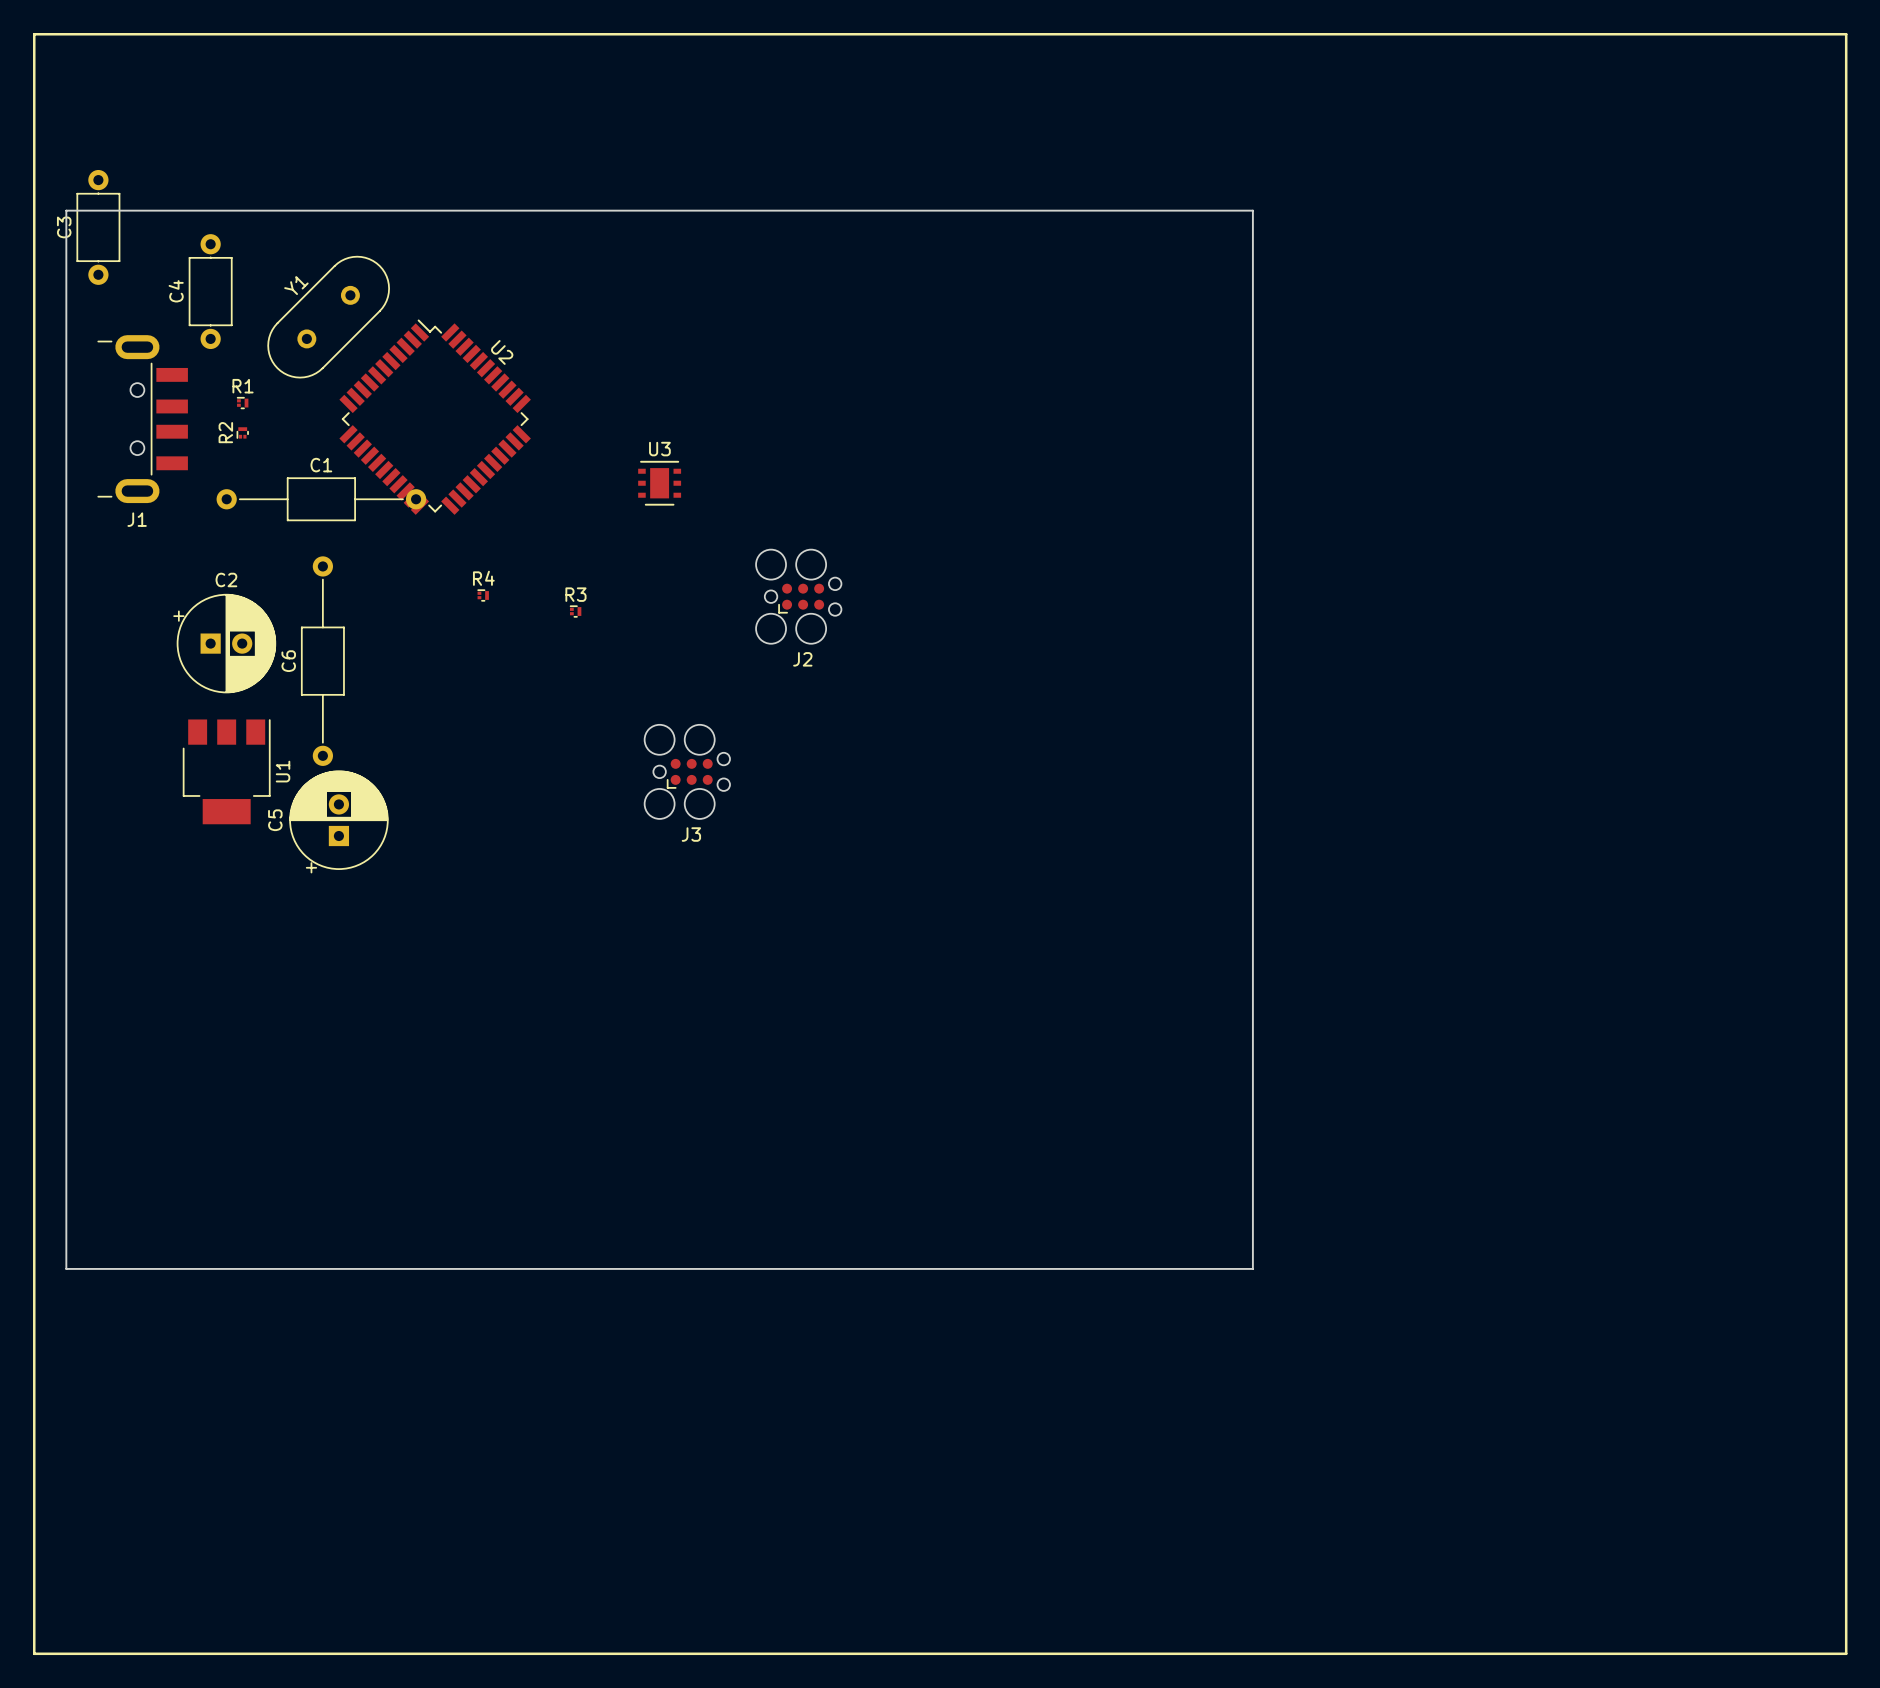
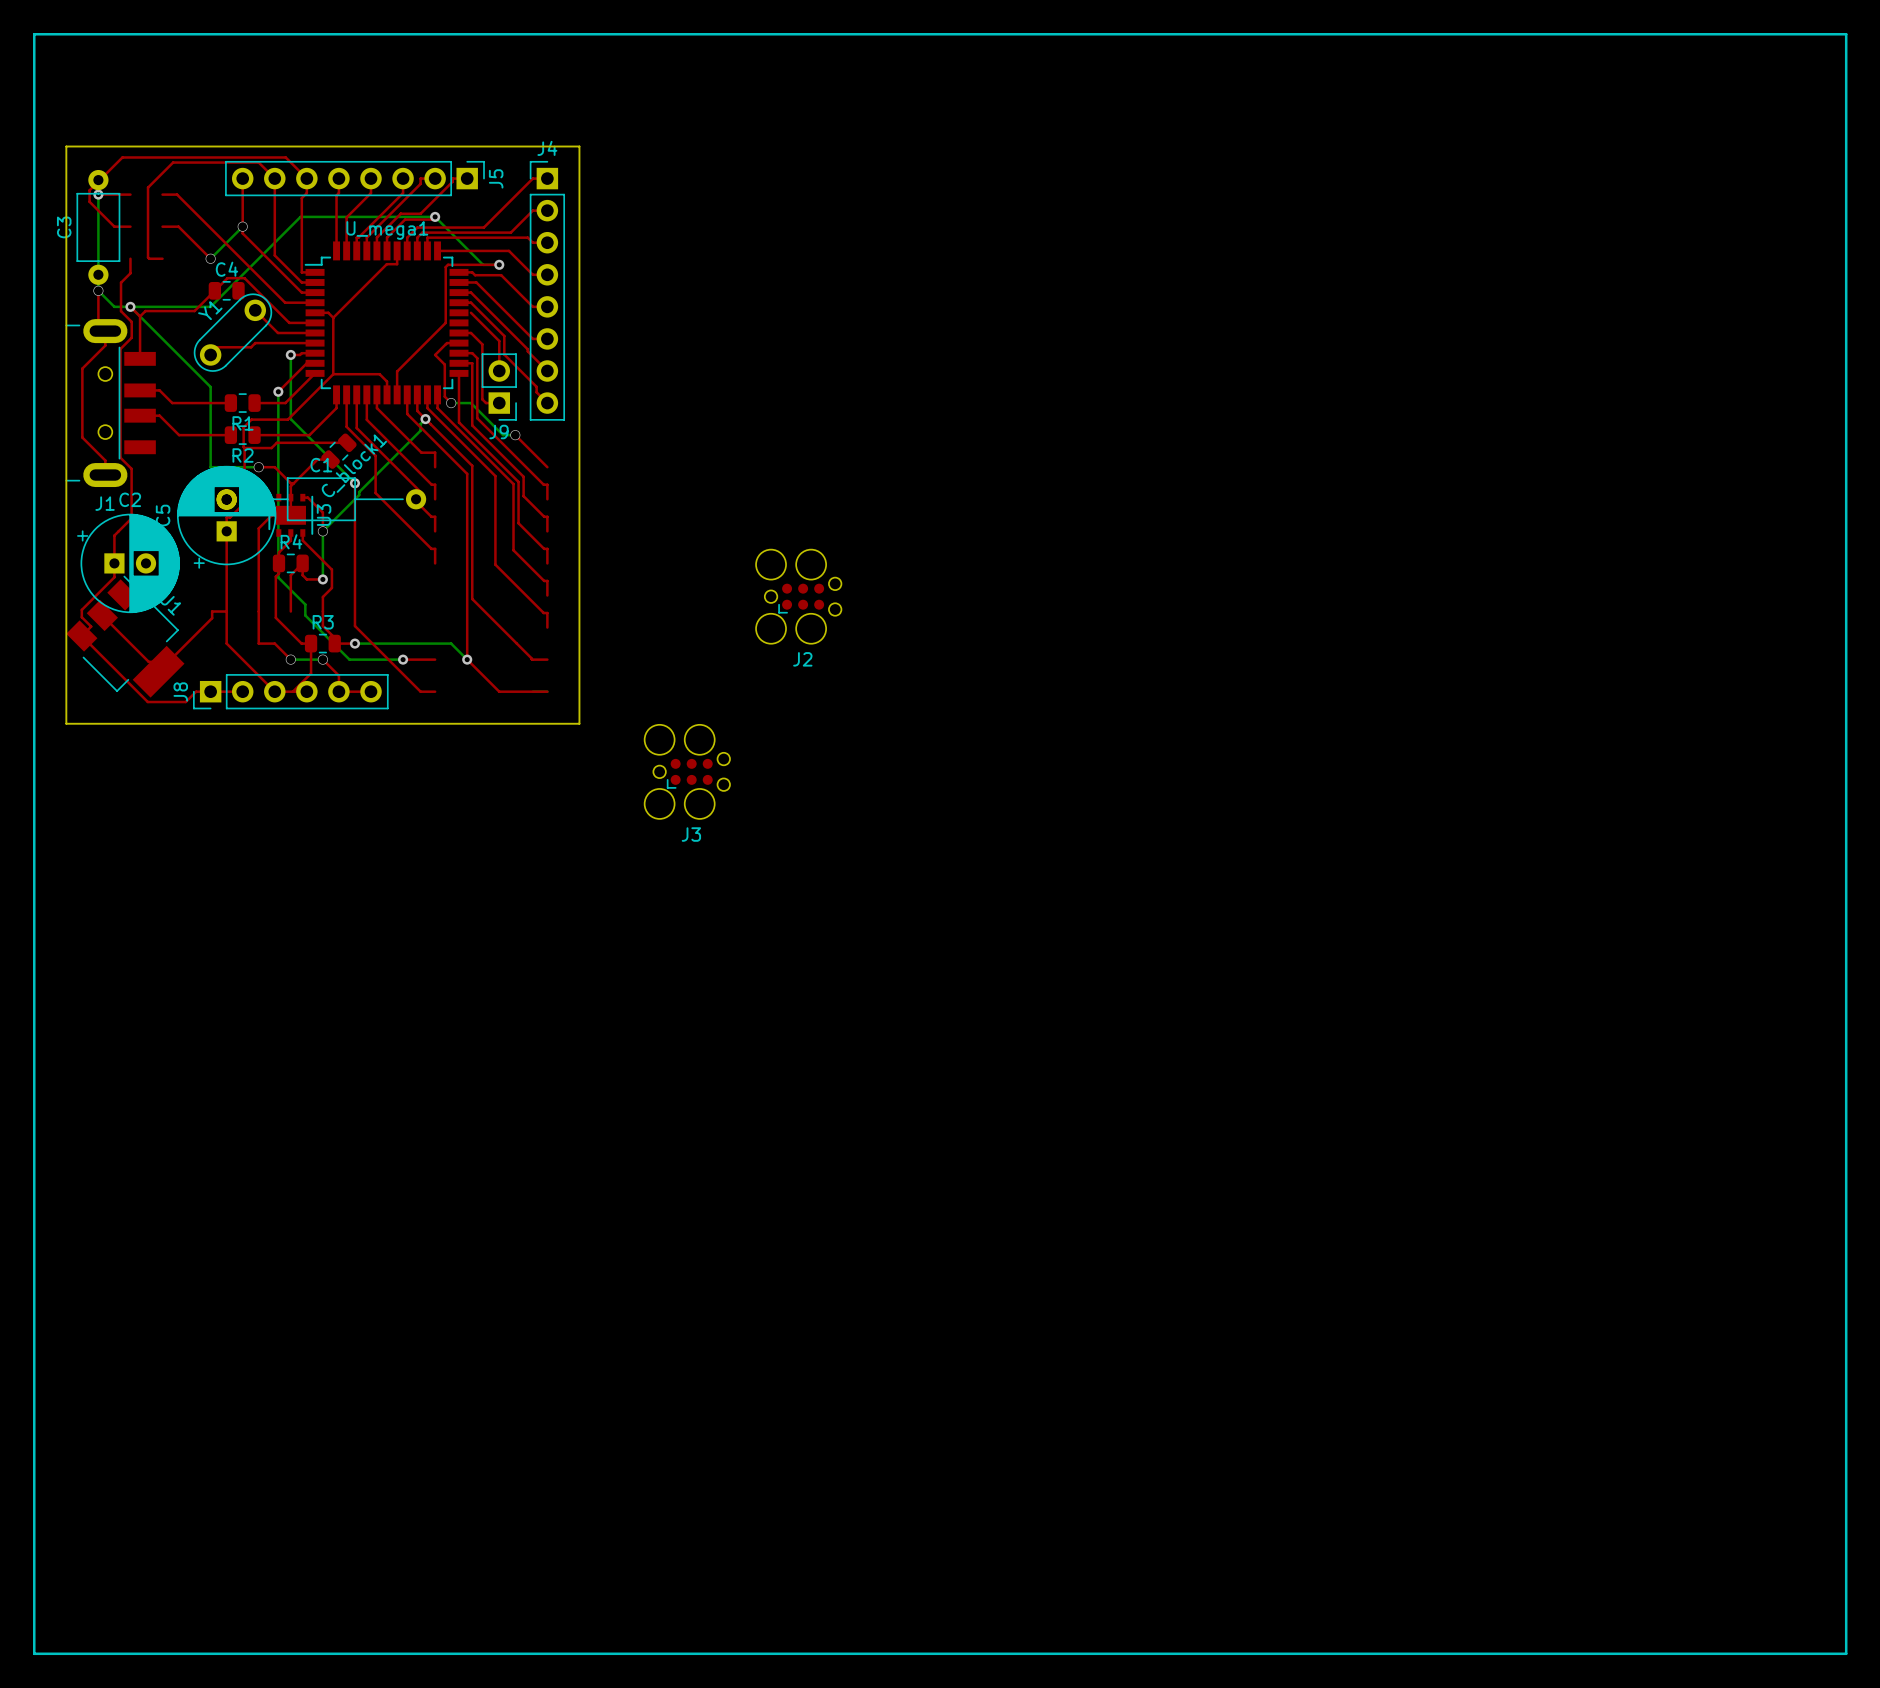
top track: none -> (242, 178) (242, 233) (301, 292) (315, 292)
top track: none -> (338, 178) (338, 193) (336, 195) (336, 250)
J5: none -> (354, 178)
top track: none -> (370, 178) (370, 193) (346, 217) (346, 250)
top track: none -> (403, 178) (403, 193) (356, 237) (356, 250)
top track: none -> (435, 178) (420, 178) (420, 183) (366, 237) (366, 250)
top track: none -> (467, 178) (452, 178) (452, 181) (420, 213) (400, 213) (376, 237) (376, 250)
top track: none -> (547, 178) (532, 178) (483, 227) (417, 227) (407, 237) (407, 250)
top track: none -> (98, 194) (130, 194)
bottom track: none -> (98, 194) (98, 290) (114, 306) (210, 306) (300, 216) (435, 216) (483, 264) (499, 264)
via: none -> (98, 194)
top track: none -> (162, 194) (177, 194) (285, 302) (315, 302)
board edge: (66, 210) (1252, 210) (1252, 1268) (66, 1268) (66, 723) -> (66, 210) (66, 146) (579, 146) (579, 723) (66, 723)
top track: none -> (547, 210) (532, 210) (510, 232) (422, 232) (417, 237) (417, 250)
top track: none -> (435, 216) (432, 219) (405, 219) (387, 237) (387, 250)
via: none -> (435, 216)
top track: none -> (130, 226) (114, 226) (89, 201) (89, 190) (122, 157) (285, 157) (306, 178) (306, 193) (301, 198) (301, 272) (315, 272)
top track: none -> (162, 226) (178, 226) (210, 258)
bottom track: none -> (242, 226) (210, 258)
via: none -> (242, 226)
C4 footprint: [188, 234, 233, 350] -> [208, 281, 245, 301]
top track: none -> (547, 242) (532, 242) (527, 237) (427, 237) (427, 250)
top track: none -> (397, 250) (397, 264) (386, 264) (333, 317)
top track: none -> (437, 250) (508, 250) (532, 274) (547, 274)
Y1 footprint: [267, 255, 390, 379] -> [193, 293, 273, 372]
top track: none -> (130, 258) (130, 273) (121, 282) (121, 311) (131, 321) (131, 337) (120, 349) (120, 457) (131, 468) (131, 518) (114, 535) (114, 577) (81, 609) (81, 617) (91, 626) (81, 636) (147, 702) (185, 702) (196, 691) (242, 691)
top track: none -> (162, 258) (148, 257) (148, 187) (173, 162) (258, 162) (274, 178) (274, 255) (301, 282) (315, 282)
via: none -> (210, 258)
top track: none -> (499, 264) (448, 264) (445, 267) (445, 322) (397, 371) (397, 394)
via: none -> (499, 264)
top track: none -> (459, 272) (472, 272) (475, 275) (501, 275) (532, 306) (547, 306)
top track: none -> (459, 282) (476, 282) (532, 338) (547, 338)
top track: none -> (98, 290) (98, 324) (105, 331) (105, 345) (82, 368) (82, 437) (105, 460) (105, 475)
via: none -> (98, 290)
J4: none -> (547, 290)
C4 name position: C4 (176, 291) -> C4 (226, 269)
top track: none -> (459, 292) (470, 292) (547, 370)
top track: none -> (459, 302) (470, 302) (504, 336) (504, 354) (536, 386) (536, 392) (547, 403)
top track: none -> (130, 306) (140, 316)
bottom track: none -> (130, 306) (210, 387) (210, 467) (258, 467)
via: none -> (130, 306)
top track: none -> (254, 310) (277, 332) (315, 332)
top track: none -> (315, 312) (328, 312) (333, 317)
top track: none -> (470, 312) (499, 341) (499, 370)
top track: none -> (140, 316) (145, 311) (194, 311) (227, 278) (244, 278) (289, 322) (315, 322)
top track: none -> (140, 316) (140, 358)
top track: none -> (333, 317) (333, 374)
U_mega1: none -> (386, 322)
top track: none -> (459, 332) (470, 332) (482, 344) (482, 399) (486, 403) (499, 403)
top track: none -> (315, 343) (255, 343) (251, 347) (214, 347) (211, 351) (210, 354)
top track: none -> (459, 343) (447, 343) (435, 354) (444, 364) (444, 396) (451, 403)
top track: none -> (315, 353) (290, 354)
top track: none -> (459, 353) (472, 353) (477, 358) (477, 418) (543, 484) (547, 484) (547, 499)
bottom track: none -> (290, 354) (290, 419) (354, 483)
via: none -> (290, 354)
top track: none -> (315, 363) (306, 363) (278, 391)
top track: none -> (459, 363) (472, 363) (472, 425) (523, 476) (523, 496) (544, 516) (547, 516) (547, 531)
top track: none -> (315, 373) (285, 403) (254, 403)
top track: none -> (459, 373) (459, 422) (518, 481) (518, 523) (544, 548) (547, 548) (547, 563)
top track: none -> (333, 374) (287, 419) (251, 419) (243, 427) (244, 448)
top track: none -> (333, 374) (379, 374) (387, 381) (387, 394)
R1 name position: R1 (243, 386) -> R1 (243, 423)
J9: none -> (499, 387)
top track: none -> (140, 390) (159, 390) (172, 403) (230, 403)
via: none -> (278, 391)
bottom track: none -> (276, 393) (278, 391) (278, 577) (305, 604) (305, 615) (349, 659) (403, 659)
top track: none -> (336, 394) (336, 408) (309, 435) (254, 435)
top track: none -> (346, 394) (346, 426) (375, 455) (375, 493) (431, 548) (435, 548) (435, 563)
top track: none -> (356, 394) (356, 428) (420, 491) (420, 505) (431, 516) (435, 516) (435, 531)
top track: none -> (366, 394) (366, 419) (431, 484) (435, 484) (435, 499)
top track: none -> (376, 394) (376, 408) (421, 452) (435, 452) (435, 467)
top track: none -> (407, 394) (407, 413) (467, 473) (467, 659) (499, 691) (547, 691)
top track: none -> (417, 394) (417, 410) (472, 465) (472, 599) (532, 659) (547, 659)
top track: none -> (427, 394) (427, 408) (495, 476) (495, 564) (543, 613) (547, 613) (547, 627)
top track: none -> (437, 394) (437, 408) (513, 484) (513, 550) (544, 580) (547, 580) (547, 595)
R1 footprint: [236, 397, 249, 410] -> [224, 393, 261, 413]
bottom track: none -> (451, 403) (470, 403) (503, 435) (515, 435)
via: none -> (451, 403)
top track: none -> (140, 415) (159, 415) (179, 435) (230, 435)
U2: (435, 417) -> none
J1 position: (142, 419) -> (110, 403)
bottom track: none -> (425, 419) (420, 424) (420, 430) (322, 531) (322, 579)
via: none -> (425, 419)
R2 footprint: [236, 427, 249, 439] -> [224, 425, 261, 445]
R2 name rotation: 0° (225, 432) -> 90° clockwise (243, 455)
top track: none -> (515, 435) (547, 467)
via: none -> (515, 435)
top track: none -> (347, 442) (276, 442) (271, 448) (244, 448)
top track: none -> (244, 448) (244, 503) (230, 517) (226, 517) (226, 643) (274, 691) (306, 691)
C_block1: none -> (338, 451)
top track: none -> (330, 459) (317, 459) (290, 486) (290, 515) (271, 515) (258, 528) (258, 643) (274, 643) (290, 659)
top track: none -> (258, 467) (274, 467) (290, 483) (293, 483)
via: none -> (258, 467)
top track: none -> (354, 483) (354, 626) (420, 691) (435, 691)
via: none -> (354, 483)
U3 rotation: 0° (659, 483) -> 90° clockwise (290, 515)
U3 position: (659, 483) -> (290, 515)
top track: none -> (302, 497) (307, 497) (322, 512) (322, 531)
via: none -> (322, 531)
top track: none -> (290, 532) (290, 540) (278, 552) (278, 573) (275, 576) (275, 617) (301, 643) (311, 643) (311, 673) (292, 691)
top track: none -> (302, 532) (302, 540) (331, 569) (331, 587) (322, 596) (322, 626) (334, 637) (334, 643) (354, 643)
top track: none -> (322, 579) (306, 579) (302, 575) (302, 563) (290, 575) (290, 611)
via: none -> (322, 579)
R4 footprint: [477, 589, 489, 602] -> [272, 553, 309, 574]
R3 footprint: [569, 605, 582, 618] -> [304, 633, 341, 654]
top track: none -> (226, 611) (212, 611) (212, 618) (158, 671)
top track: none -> (102, 615) (148, 661) (168, 661)
C2 position: (224, 643) -> (128, 563)
bottom track: none -> (354, 643) (451, 643) (467, 659)
via: none -> (354, 643)
bottom track: none -> (290, 659) (322, 659)
via: none -> (290, 659)
top track: none -> (322, 659) (338, 675) (338, 691) (370, 691)
via: none -> (322, 659)
top track: none -> (403, 659) (435, 659)
via: none -> (403, 659)
via: none -> (467, 659)
C6: (322, 661) -> none
J8: none -> (290, 691)
U1 rotation: 0° (226, 771) -> 45° counterclockwise (125, 636)
U1 position: (226, 771) -> (125, 636)
C5 position: (338, 821) -> (226, 517)

